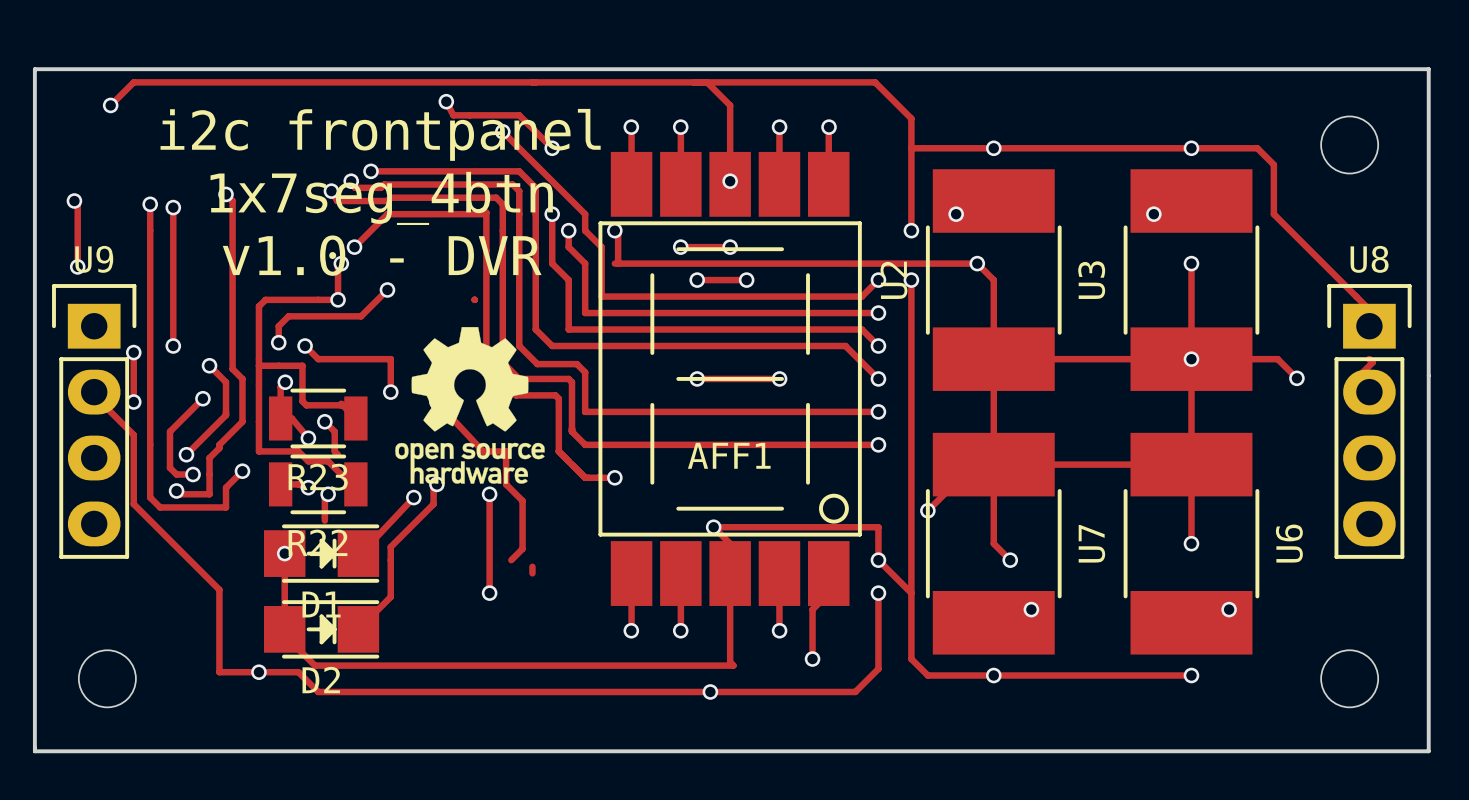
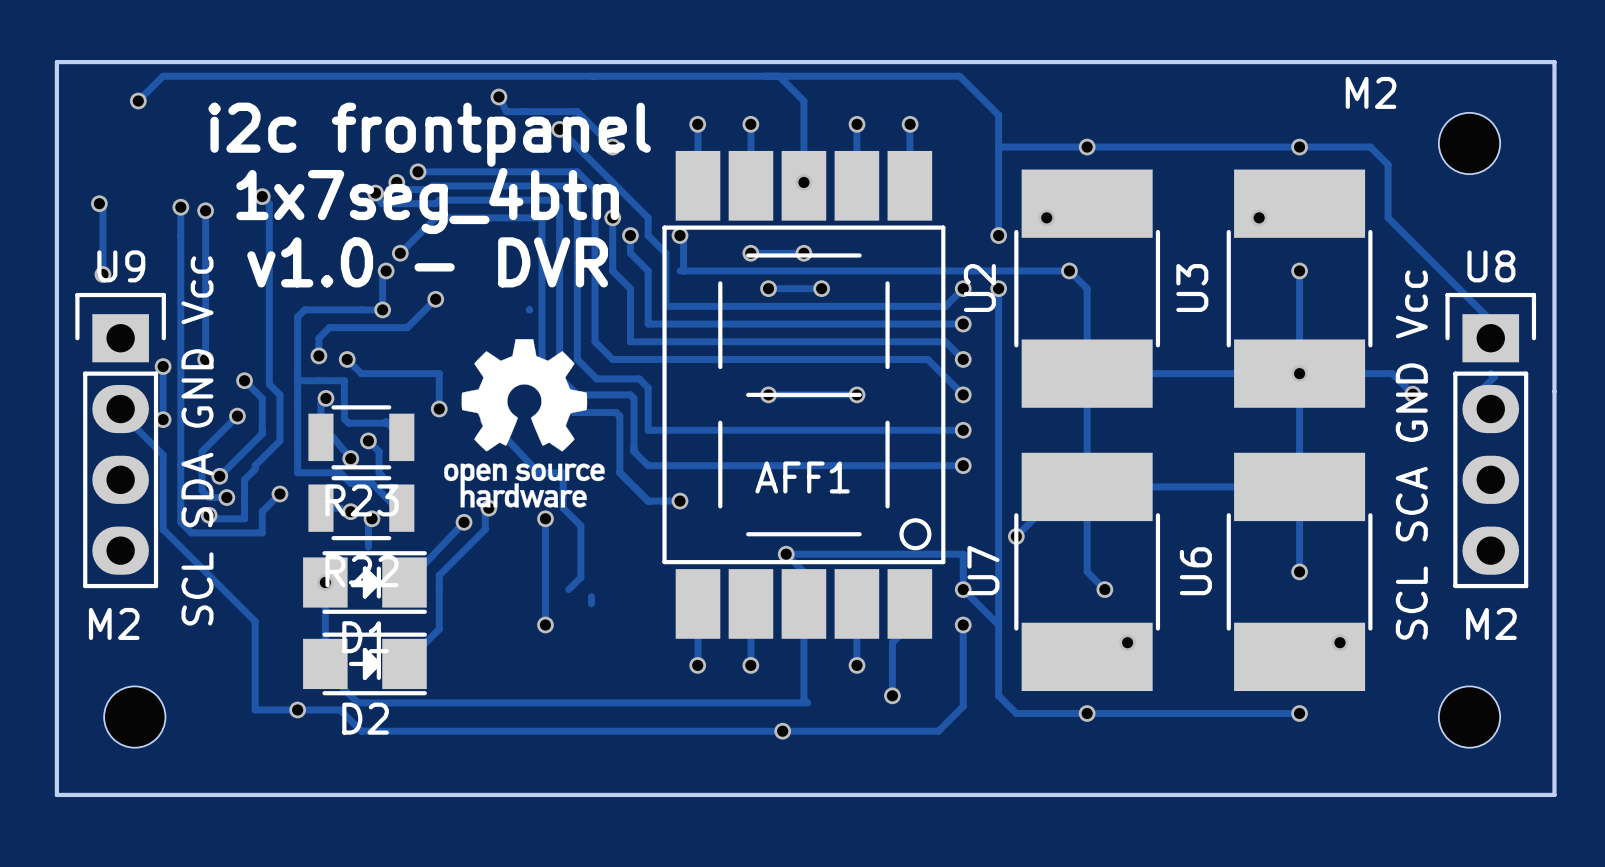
part value: none -> M2 (1371, 92)
U9 value: none -> SCL SDA GND Vcc (197, 440)
U8 value: none -> SCL SCA GND Vcc (1411, 455)
U7 name position: U7 (1091, 543) -> U7 (983, 570)
U6 name position: U6 (1289, 543) -> U6 (1195, 571)
part value: none -> M2 (114, 623)
part value: none -> M2 (1491, 623)

